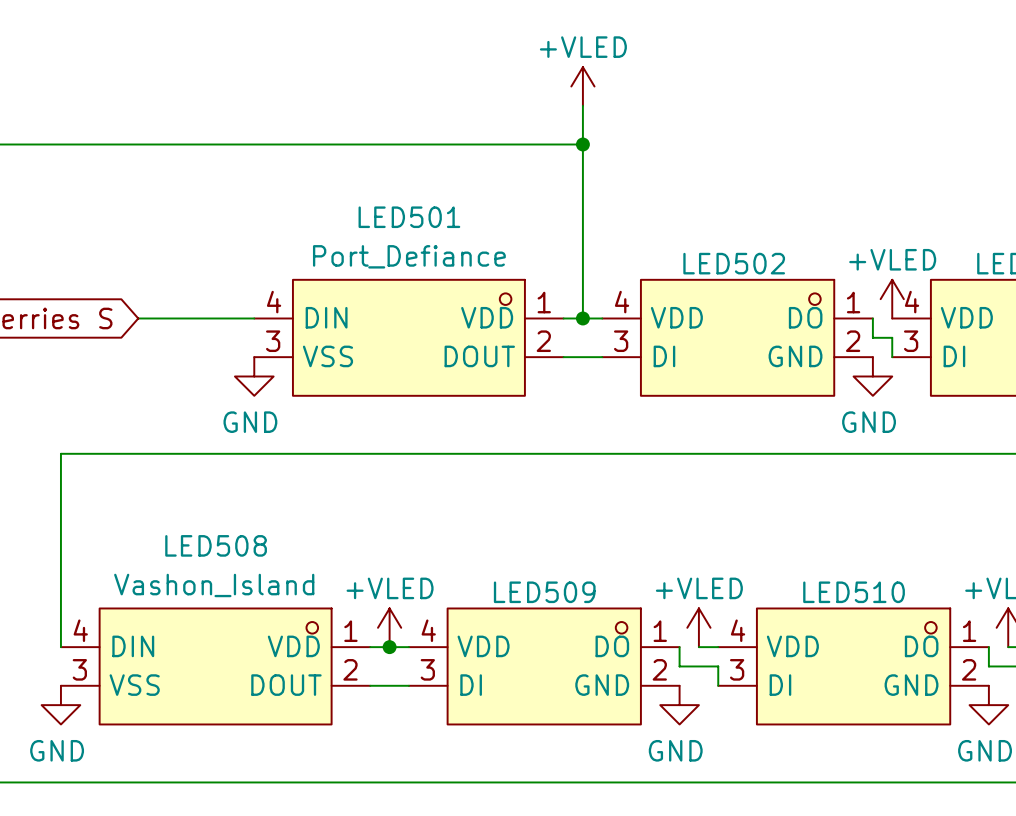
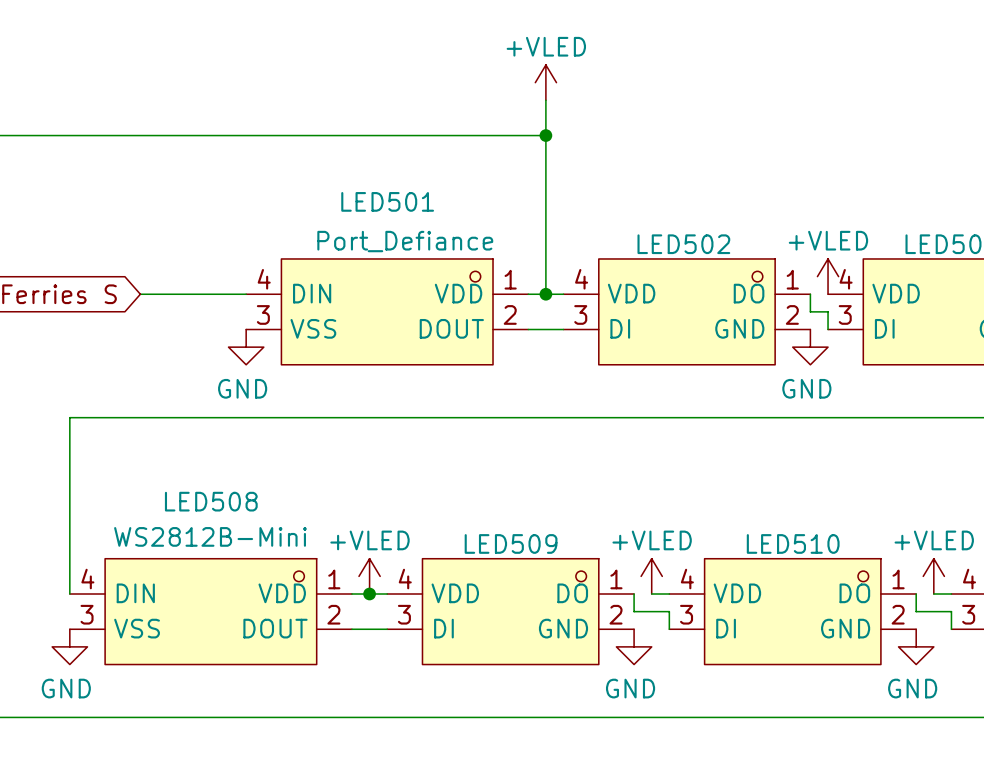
LED501 value: Port_Defiance (409, 256) -> none
LED501 text: none -> Port_Defiance (405, 241)
LED508 value: Vashon_Island (214, 585) -> WS2812B-Mini (210, 536)

